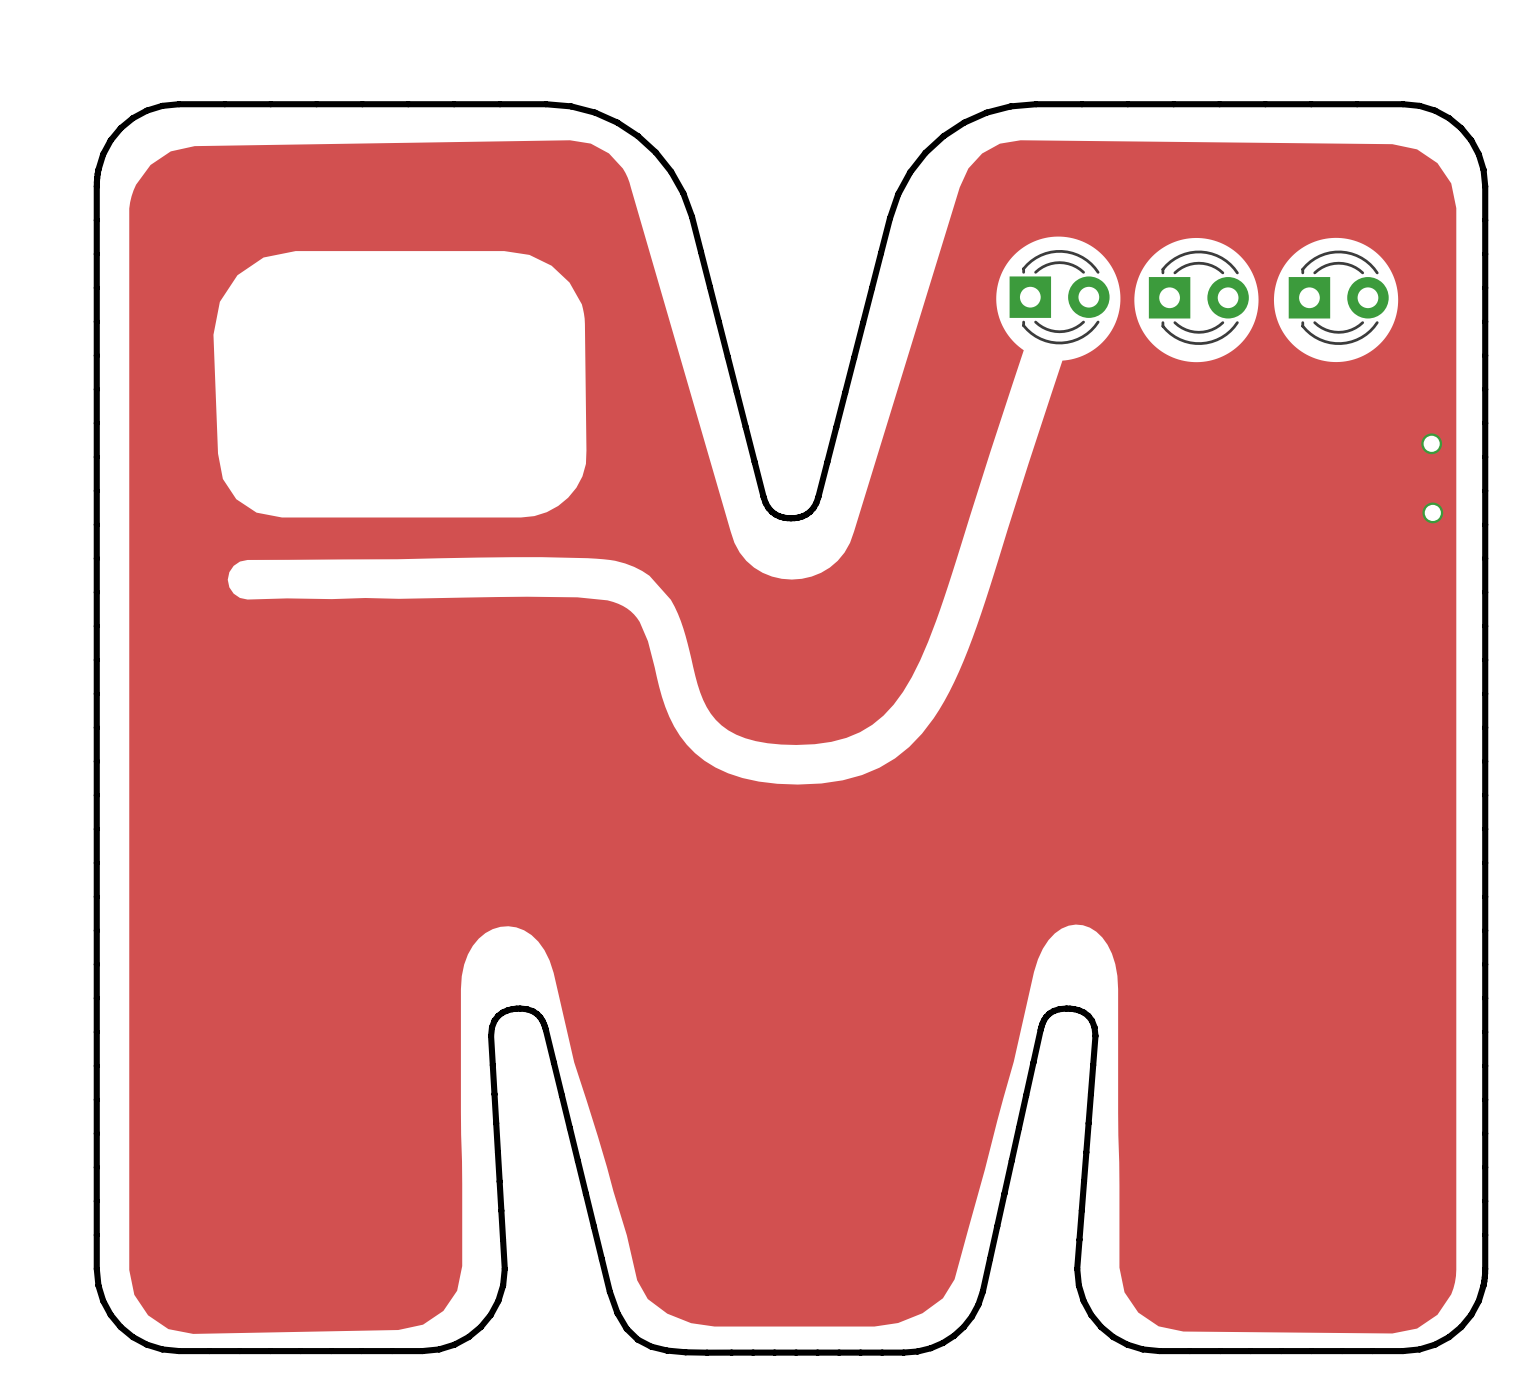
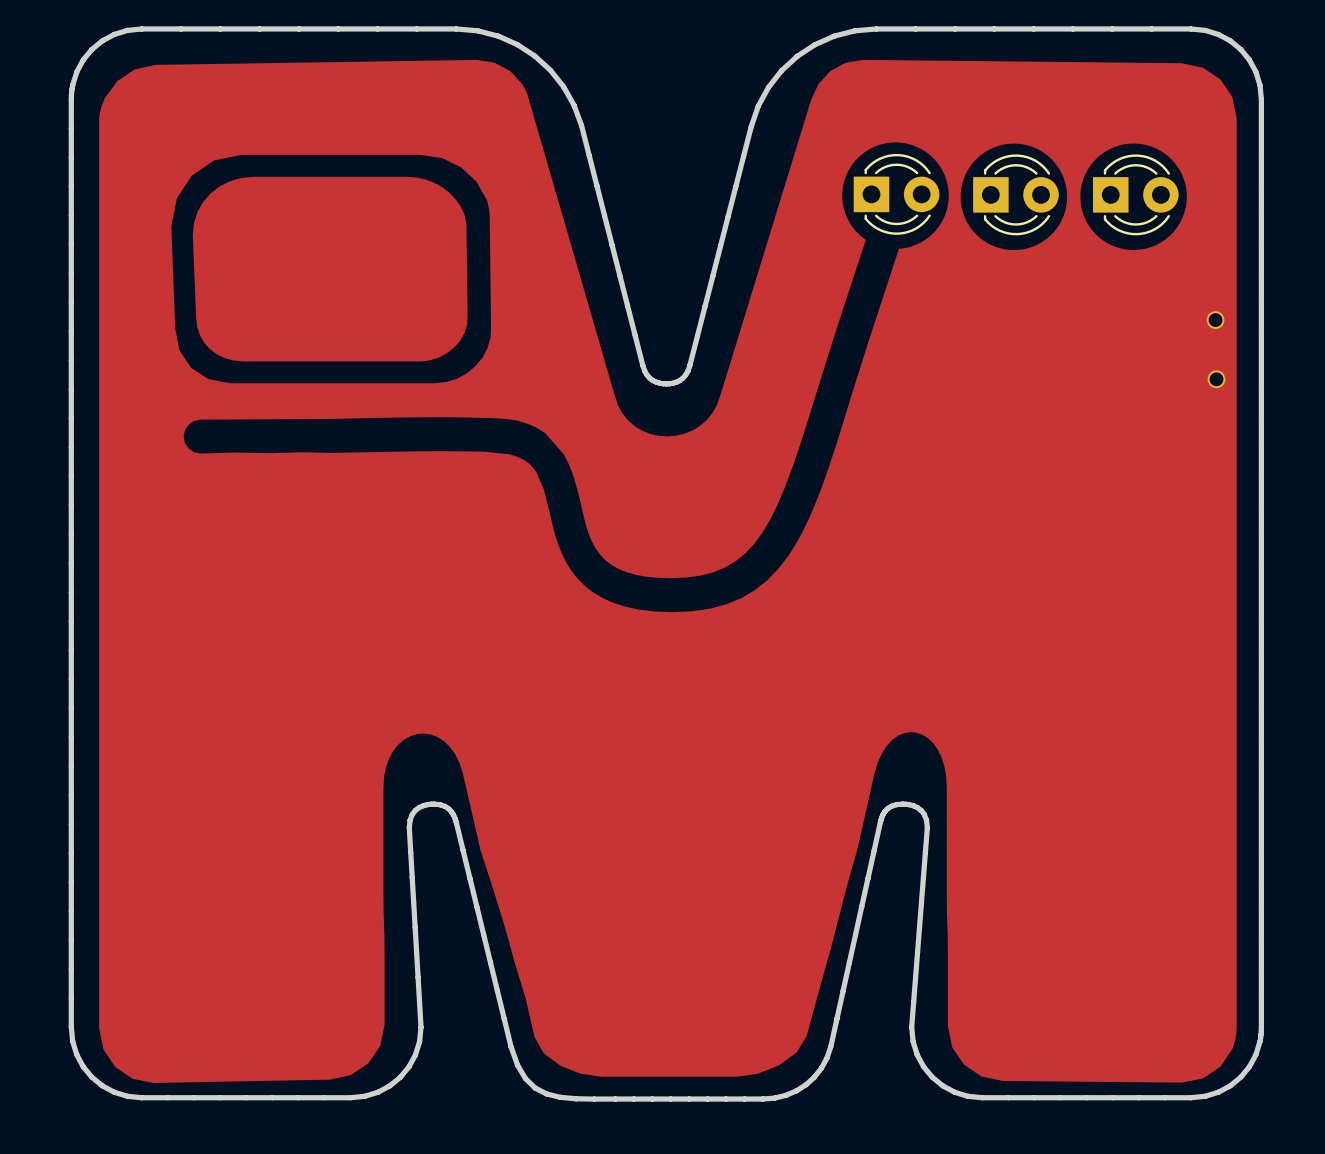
drawing: none -> [192, 176, 468, 362]

